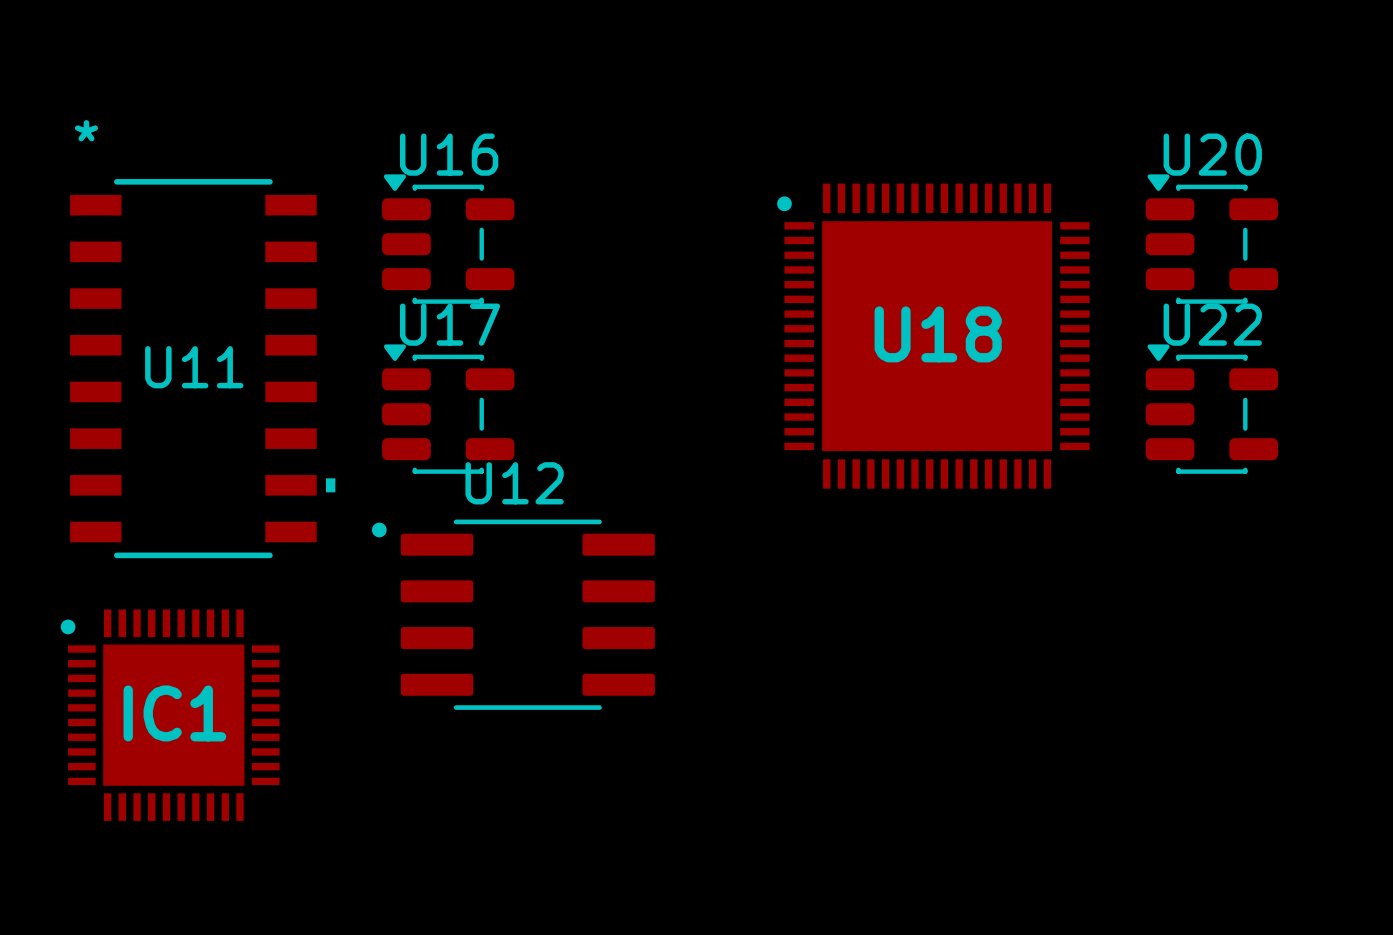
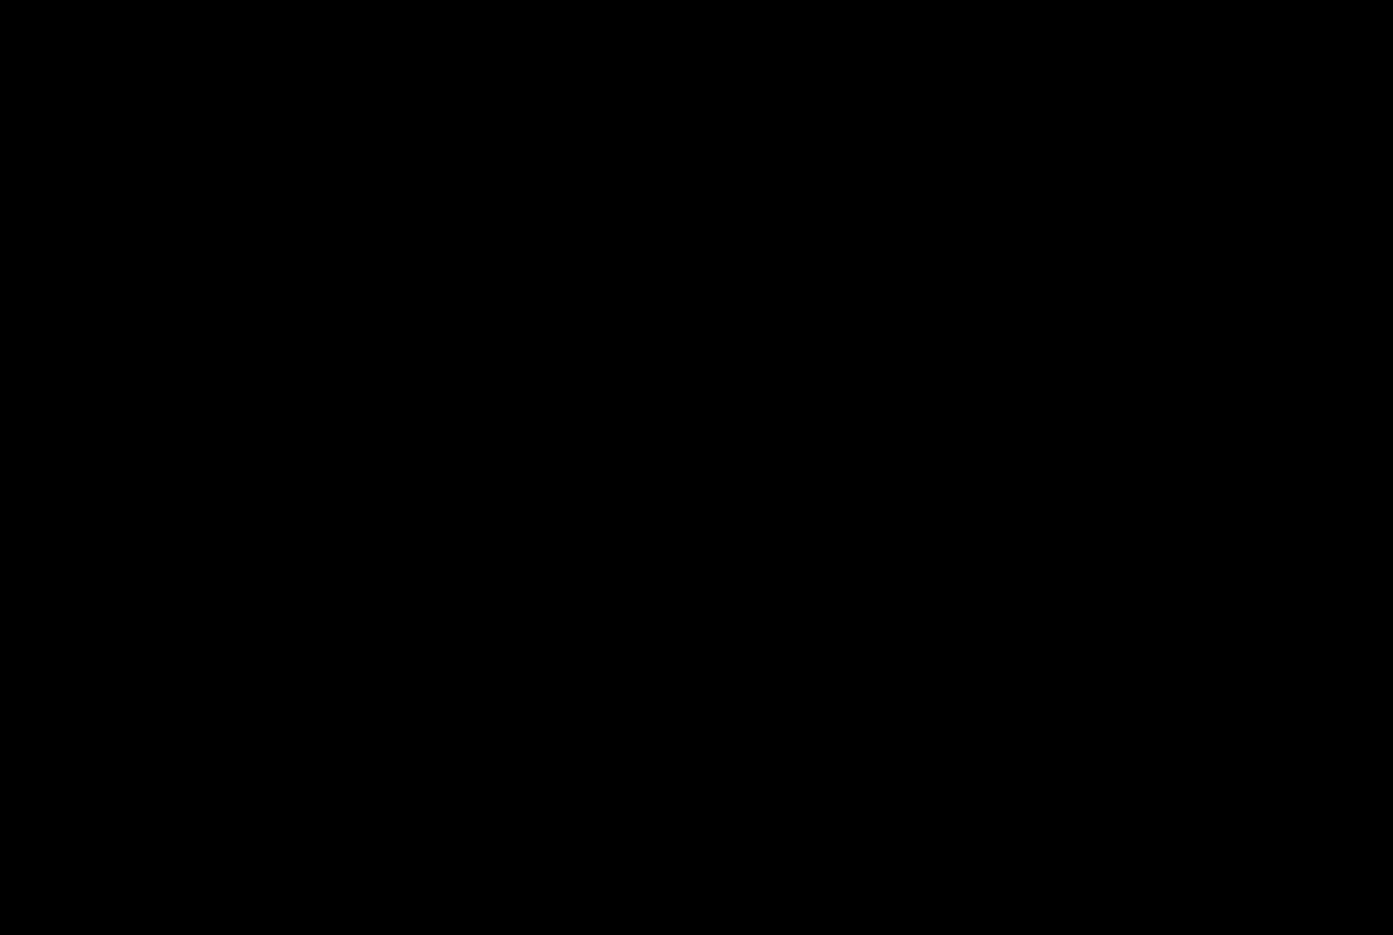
U16: (448, 239) -> none
U20: (1211, 239) -> none
U18: (933, 336) -> none
U11: (202, 368) -> none
U17: (448, 409) -> none
U22: (1211, 409) -> none
U12: (513, 614) -> none
IC1: (170, 715) -> none

